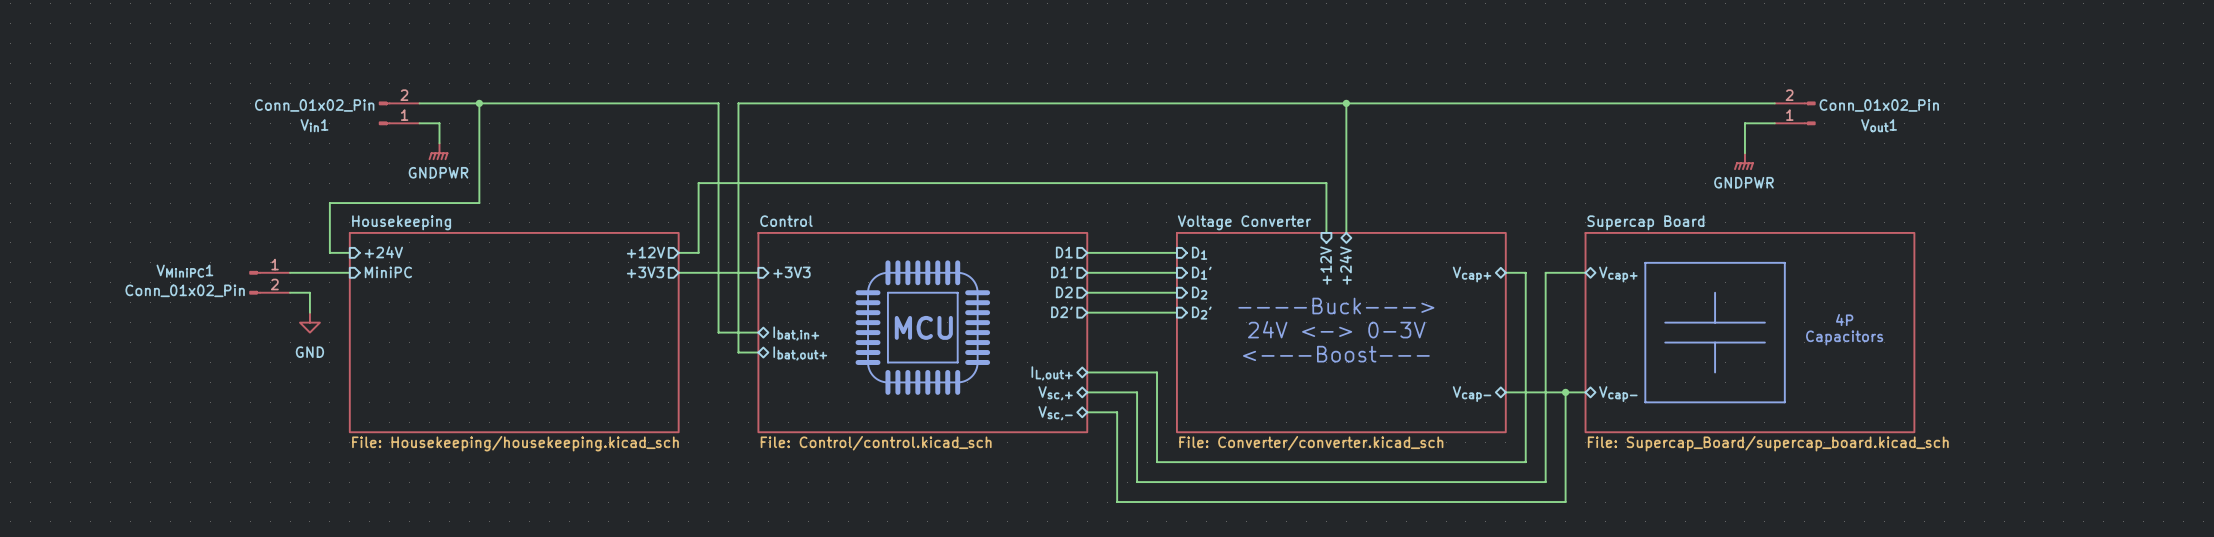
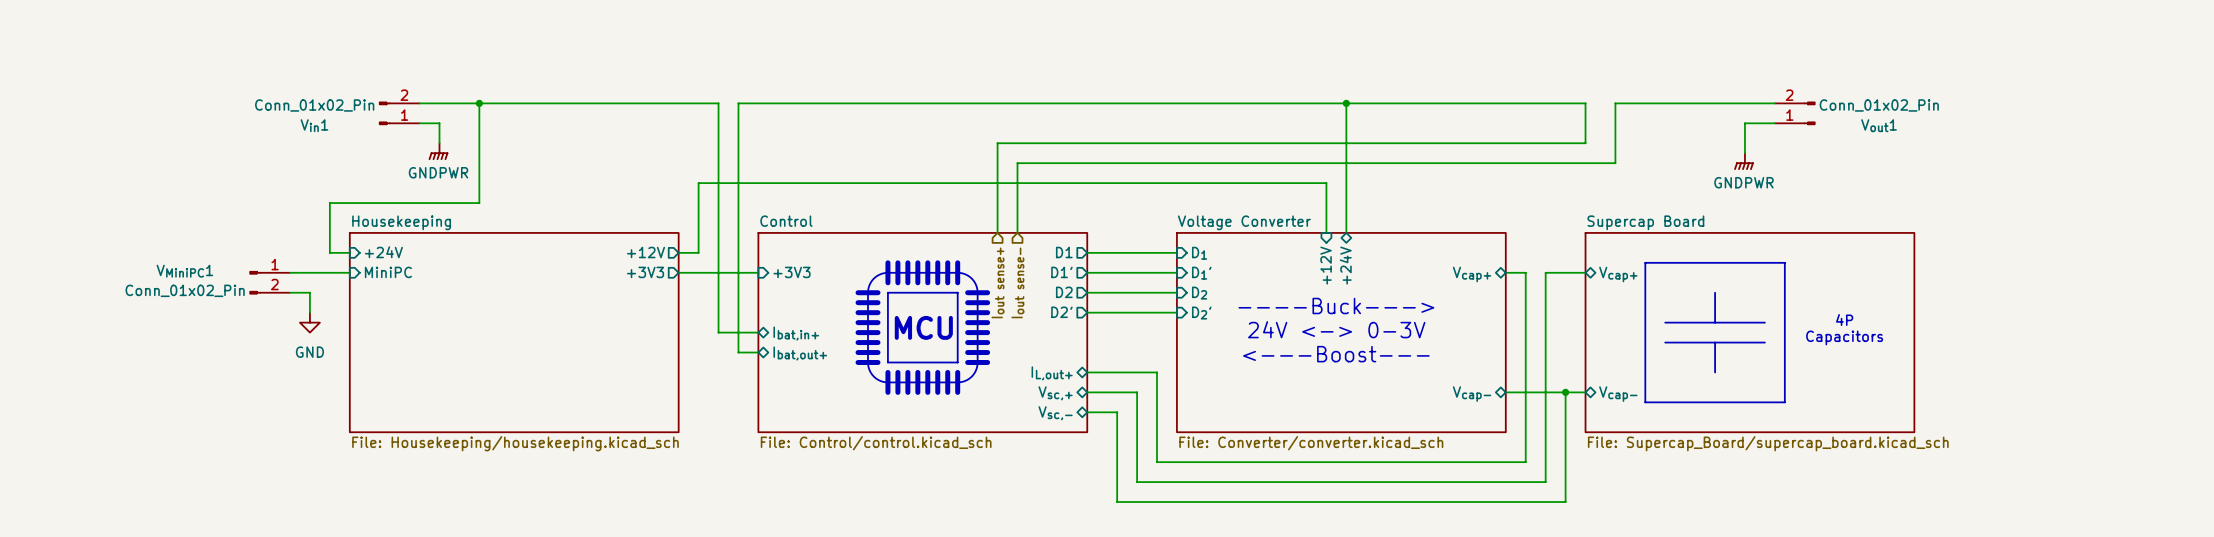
wire: (1585, 103) (1615, 103) -> (1017, 232) (1017, 163) (1615, 163) (1615, 103)
wire: none -> (1585, 103) (1585, 143) (997, 143) (997, 232)
hierarchical label: none -> Iout sense+ (997, 282)
hierarchical label: none -> Iout sense- (1017, 282)

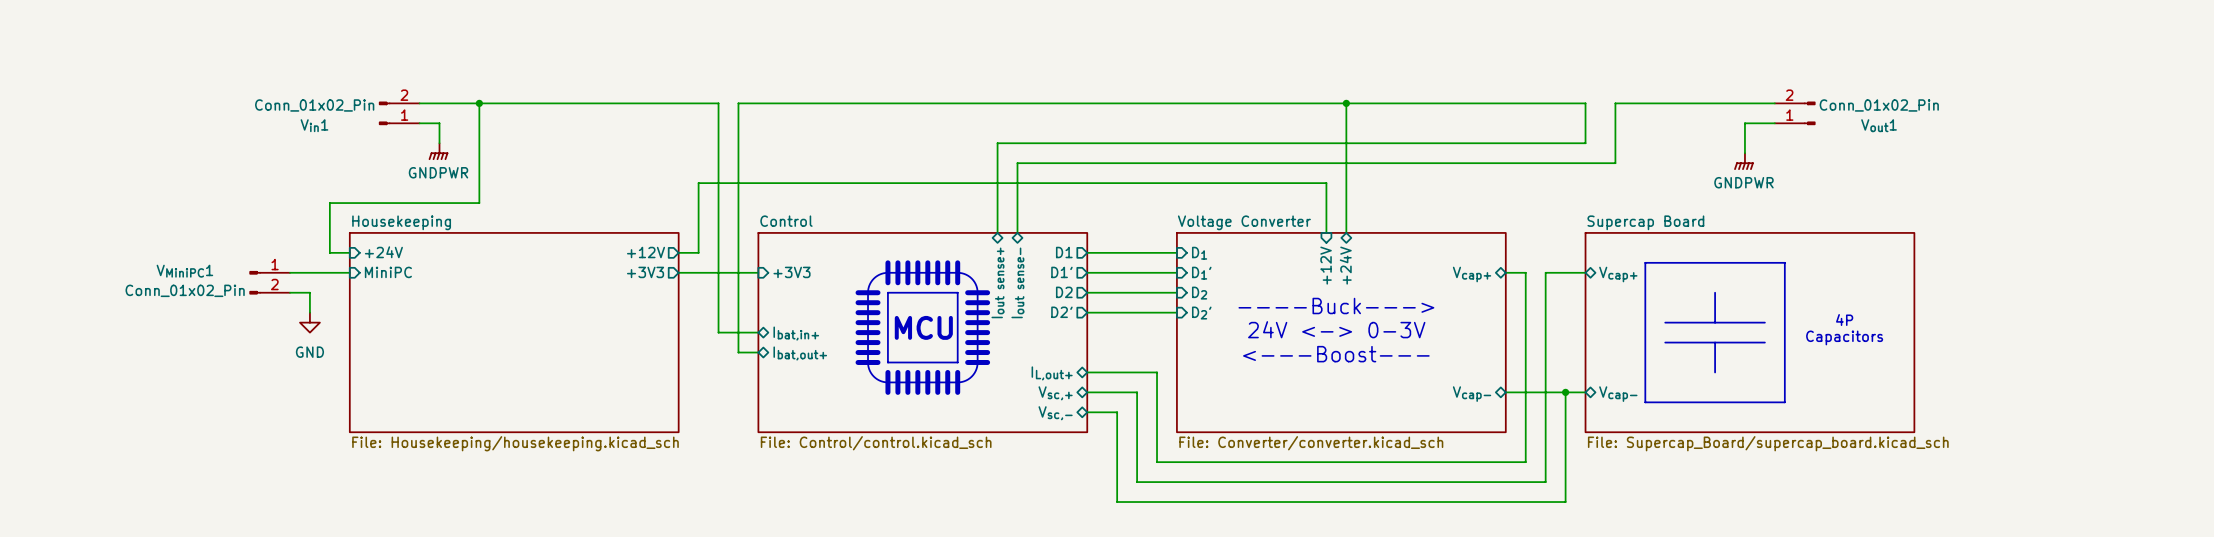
hierarchical label: Iout sense+ (997, 282) -> none
sheet pin: none -> Iout sense+ (997, 282)
hierarchical label: Iout sense- (1017, 282) -> none
sheet pin: none -> Iout sense- (1017, 282)

